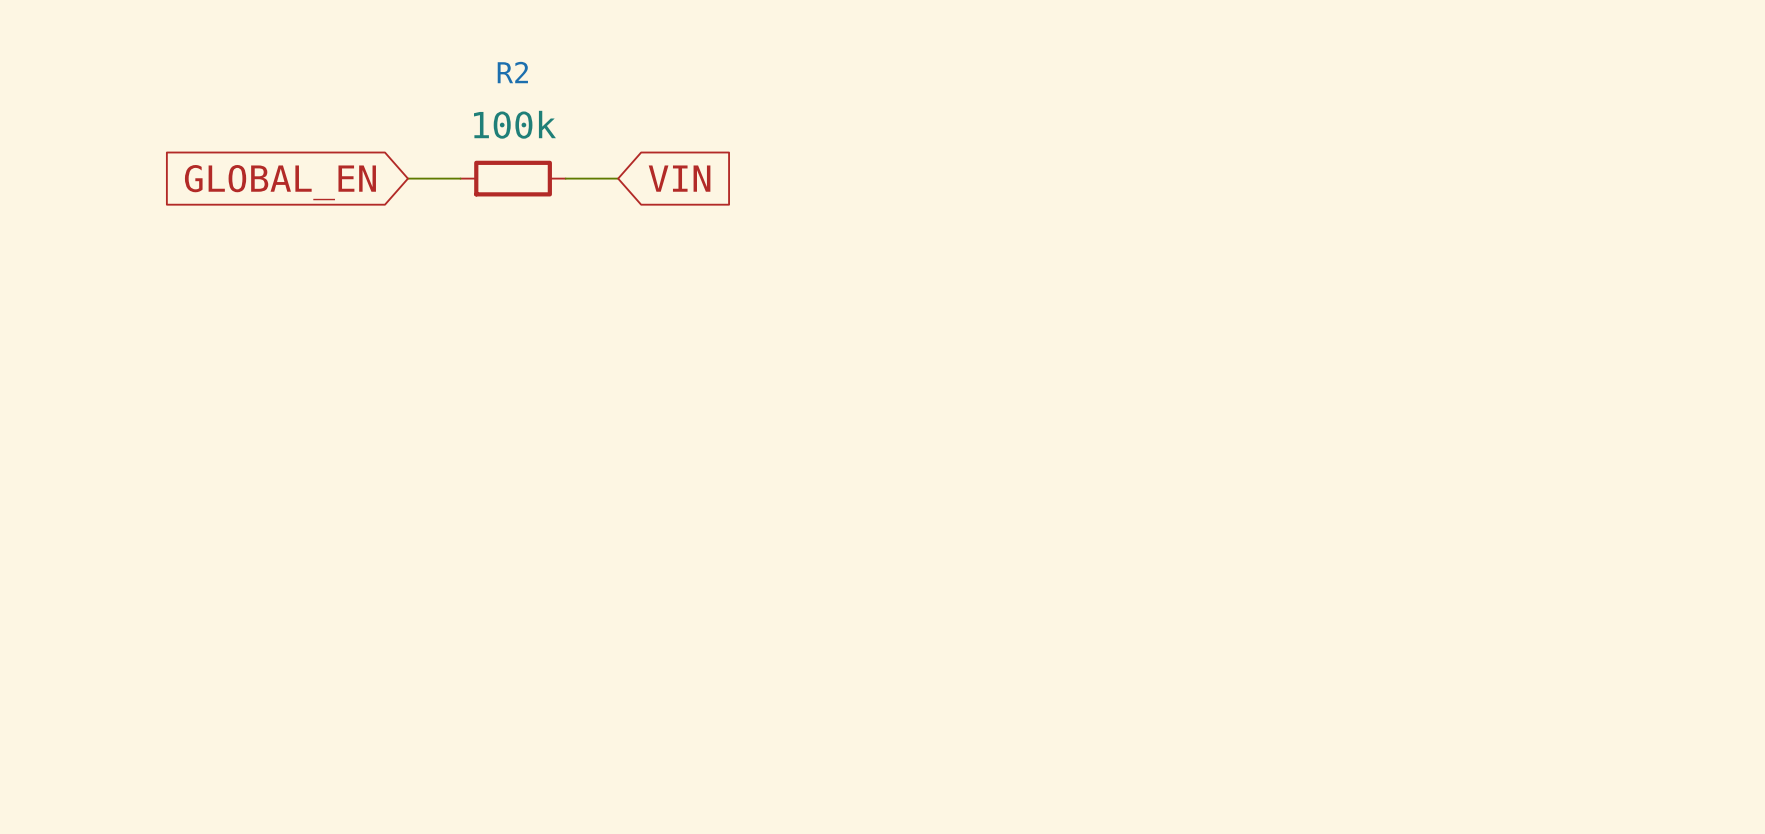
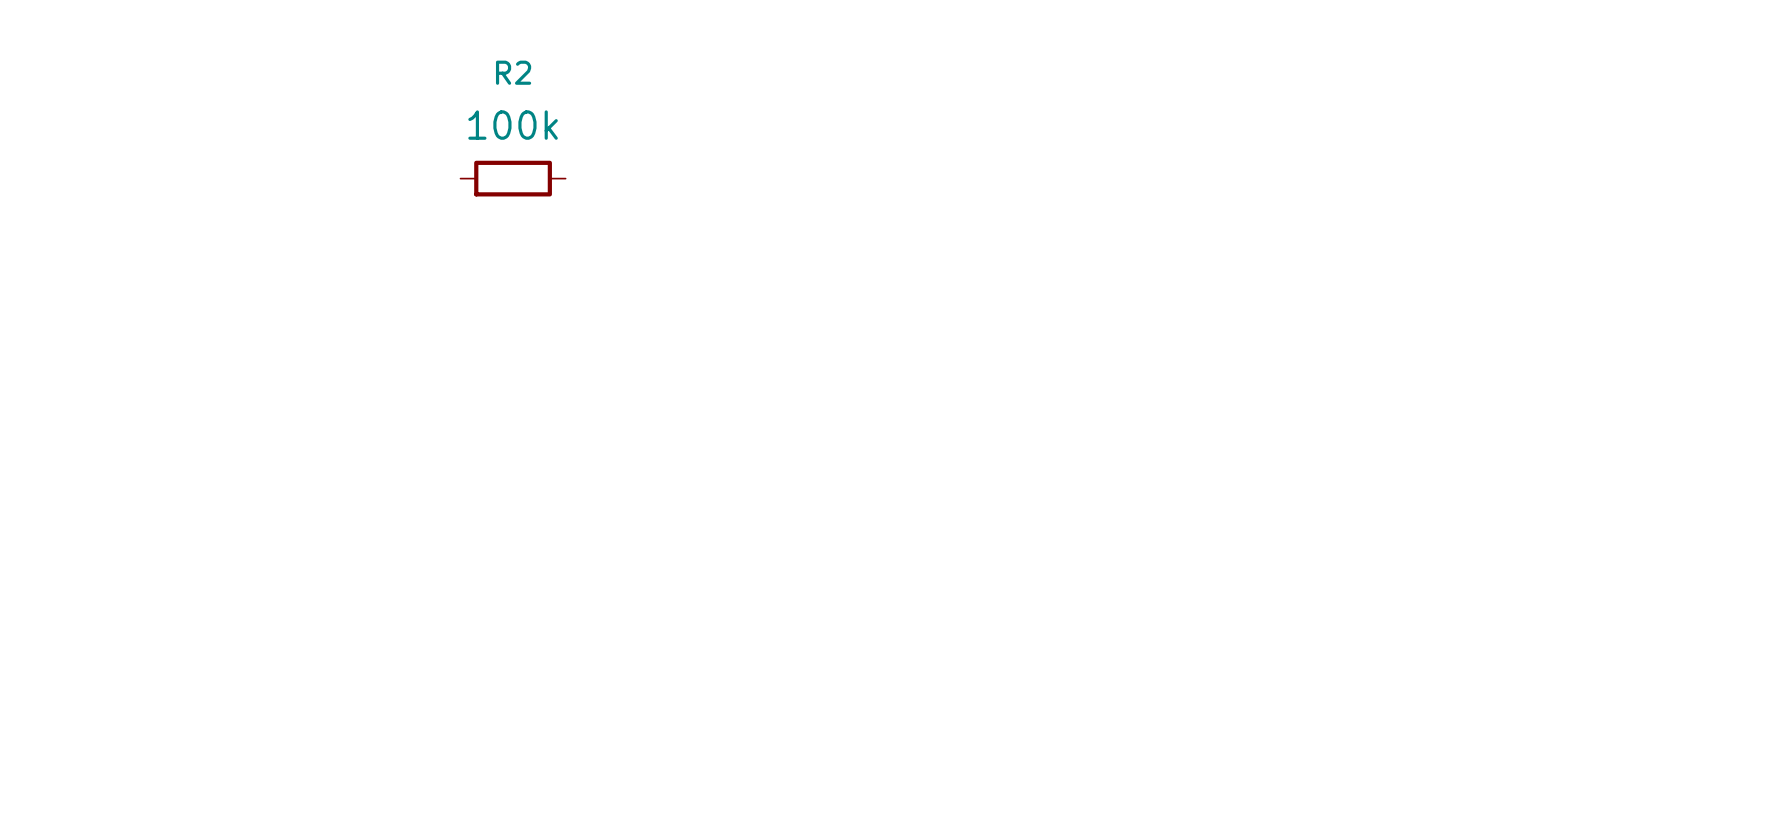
wire: (407, 178) (460, 178) -> none
wire: (565, 178) (618, 178) -> none
global label: VIN (679, 178) -> none
global label: GLOBAL_EN (280, 182) -> none

